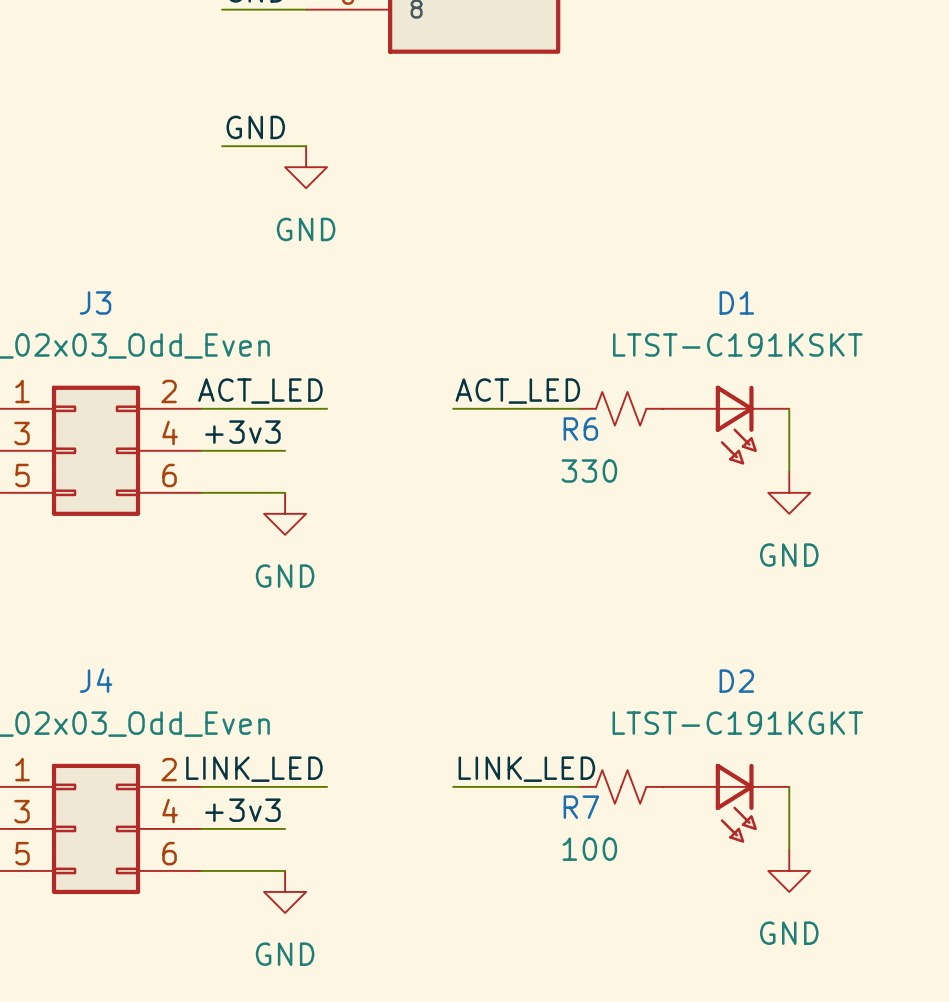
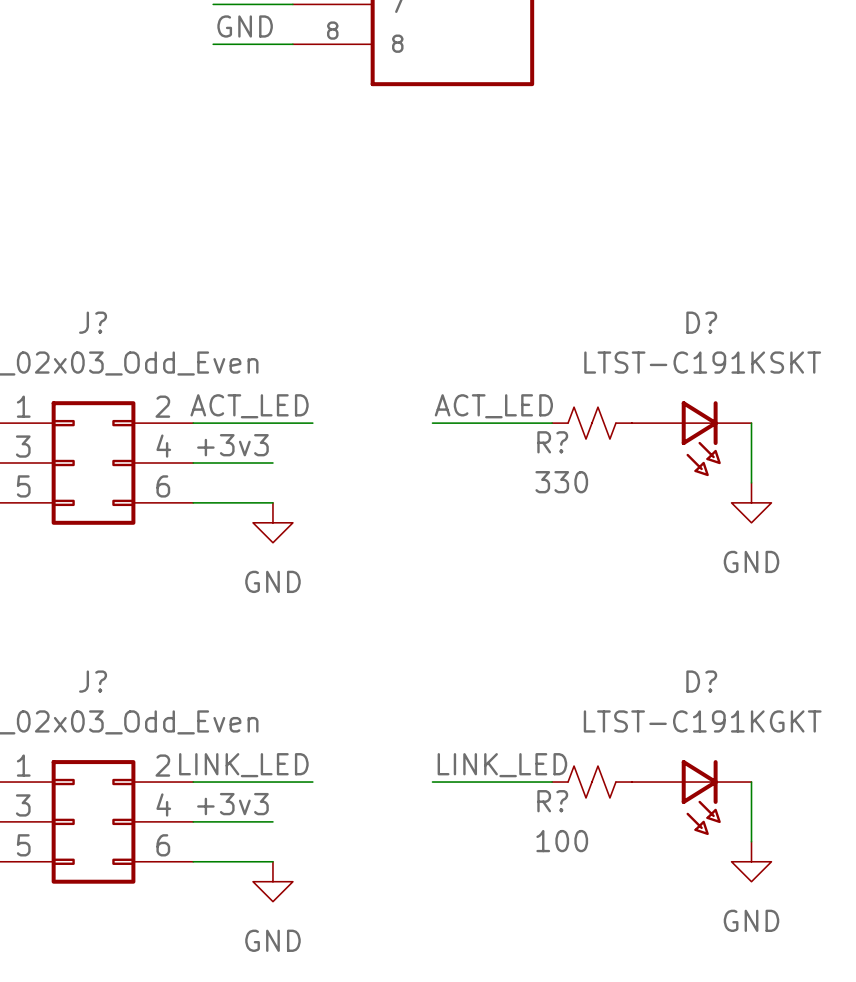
label: GND (255, 127) -> none
wire: (222, 146) (306, 146) -> none
power symbol: GND (306, 167) -> none
J3 name: J3 (95, 302) -> J? (93, 322)
D1 name: D1 (736, 302) -> D? (701, 322)
R6 name: R6 (580, 429) -> R? (552, 442)
J4 name: J4 (96, 680) -> J? (93, 681)
D2 name: D2 (736, 681) -> D? (701, 681)
R7 name: R7 (581, 807) -> R? (552, 801)

